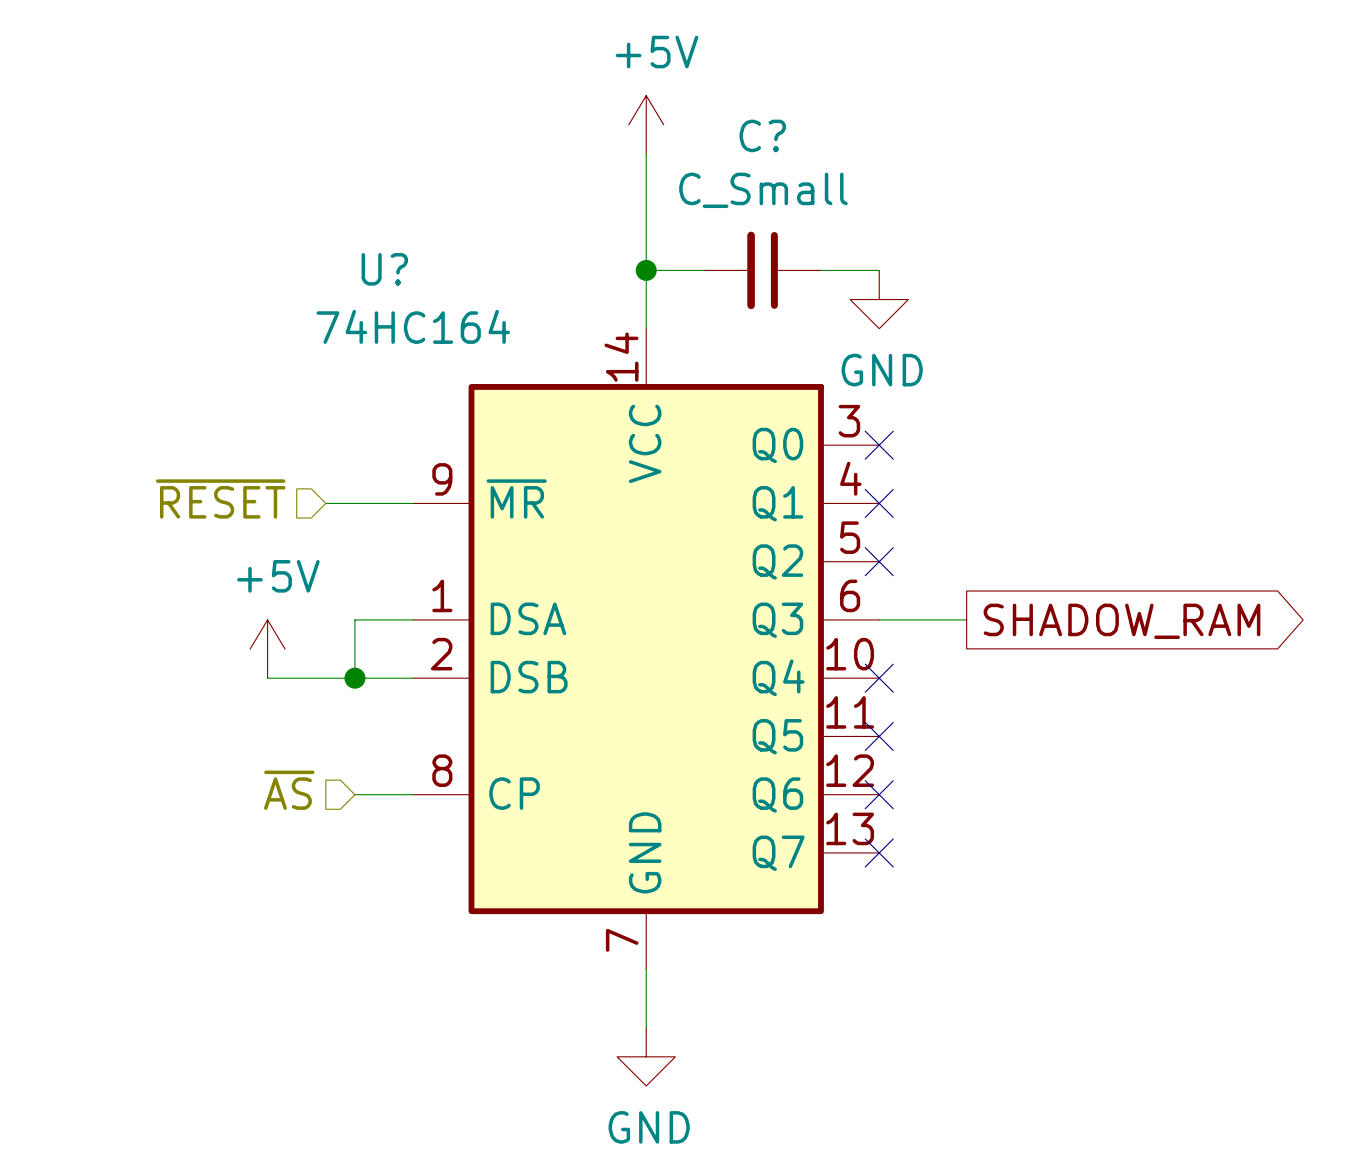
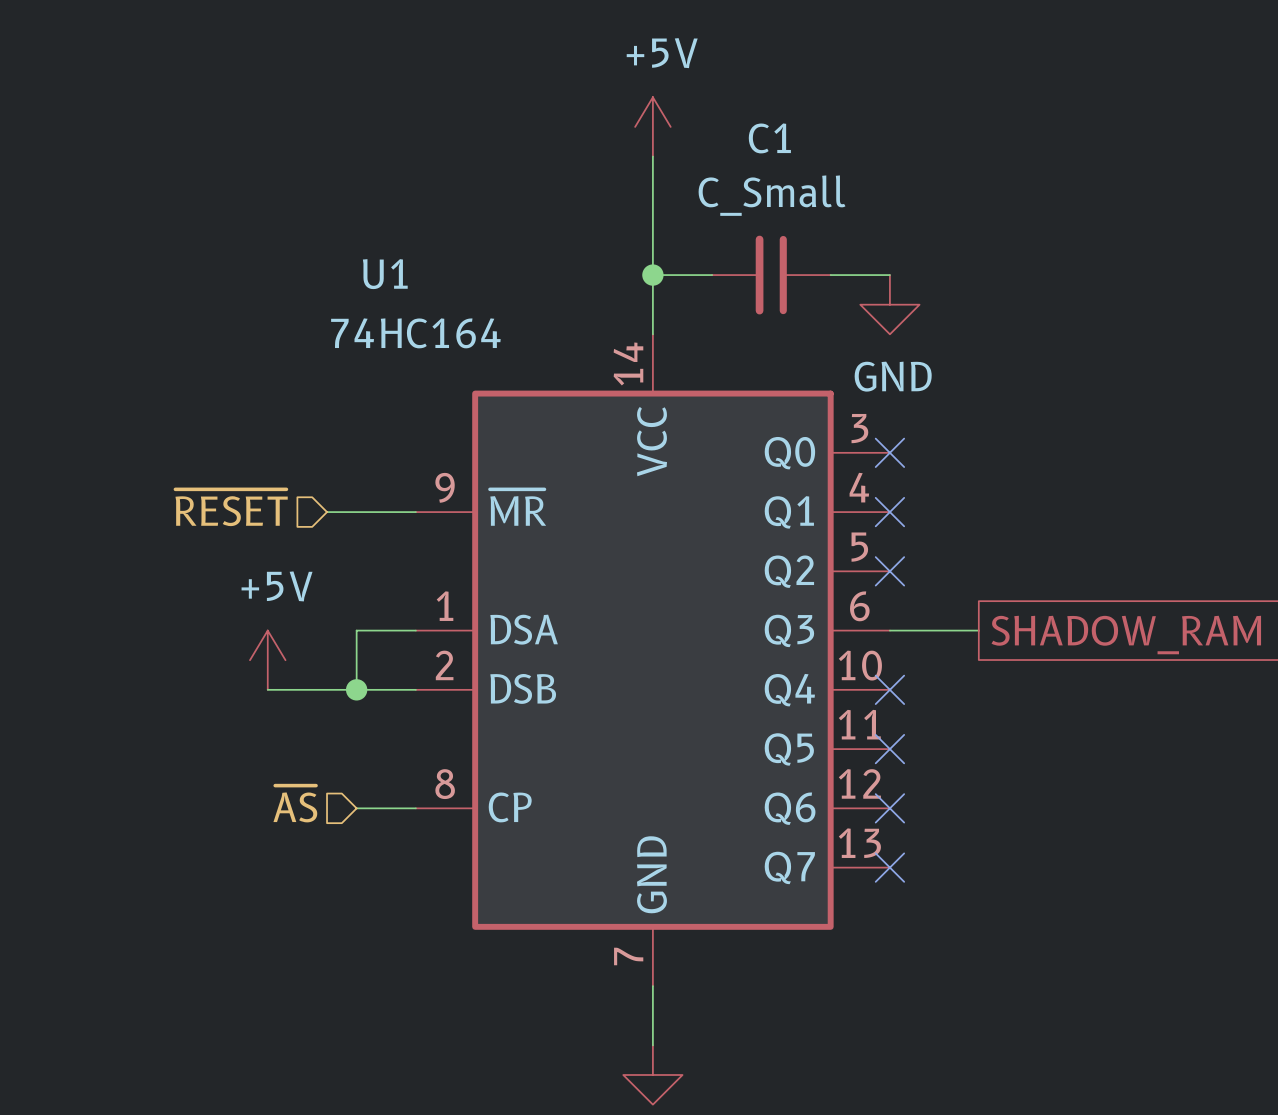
C? name: C? (762, 135) -> C1 (769, 138)
U? name: U? (384, 269) -> U1 (385, 274)

